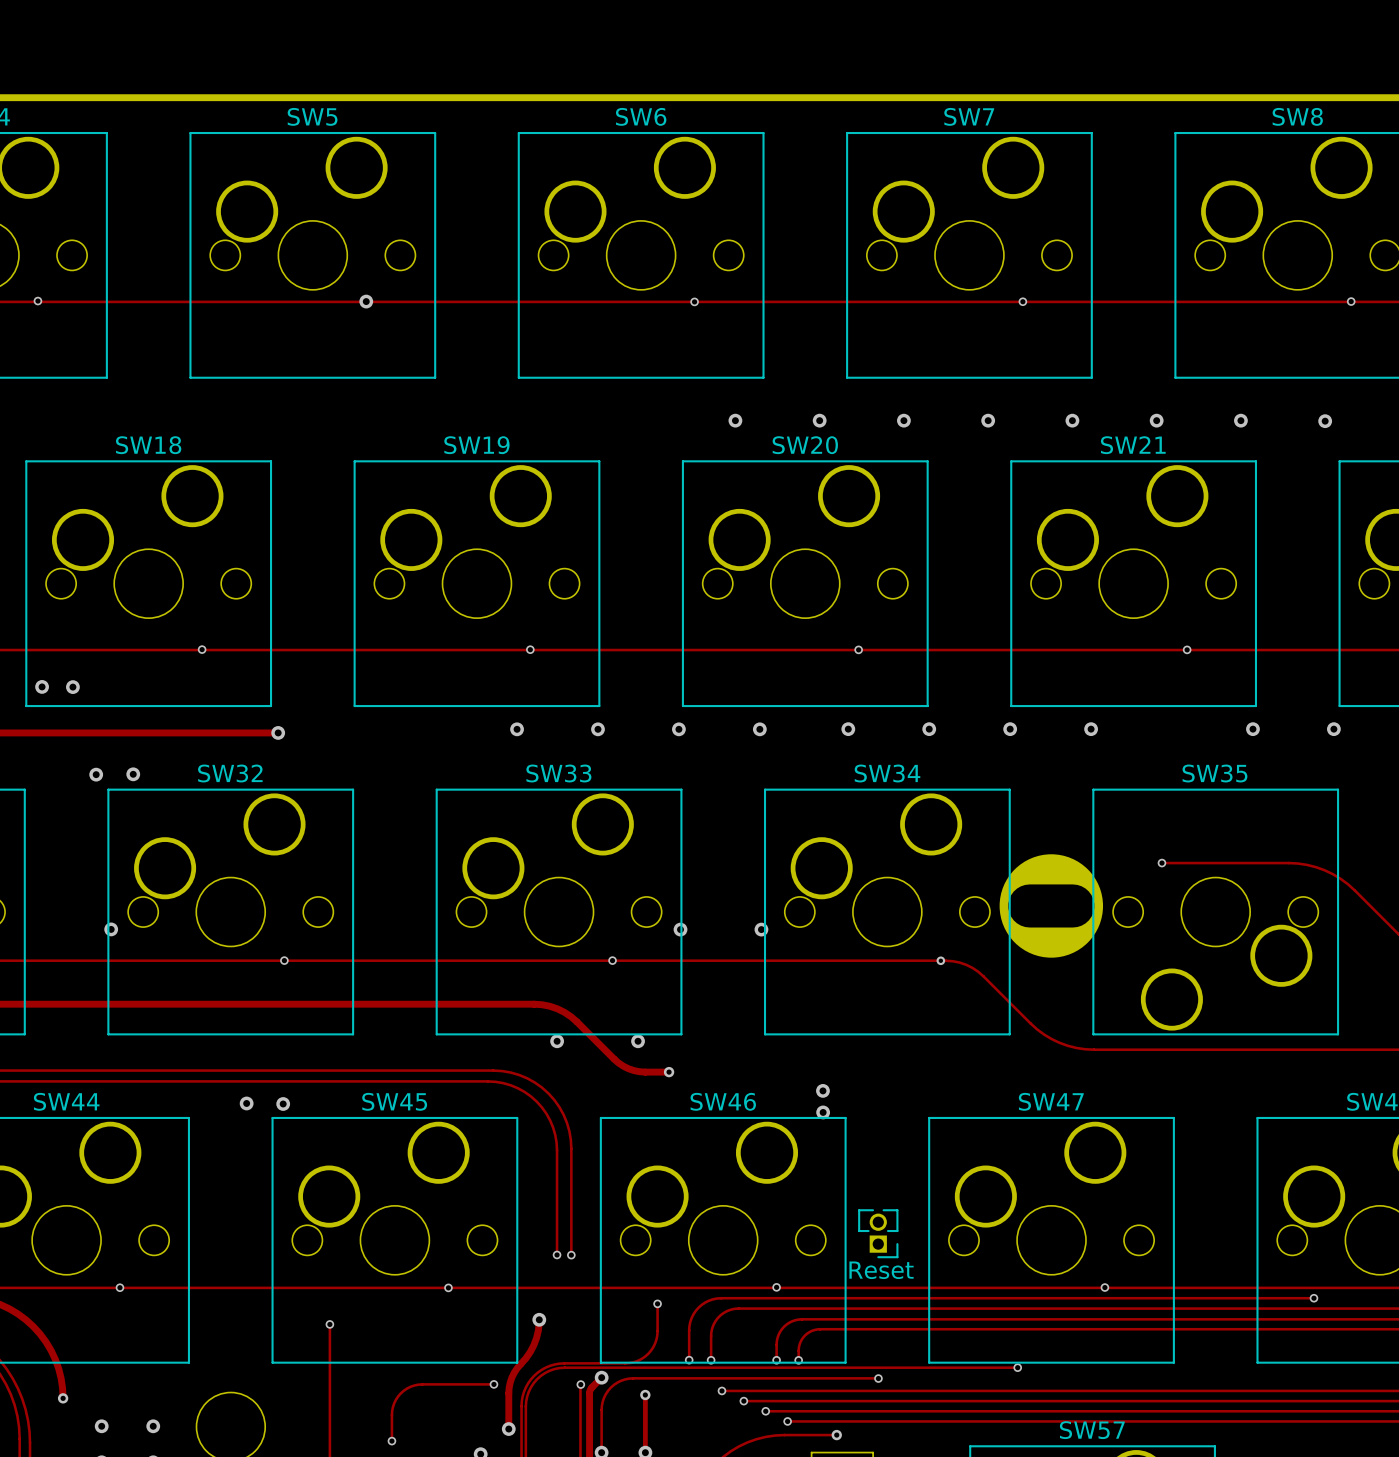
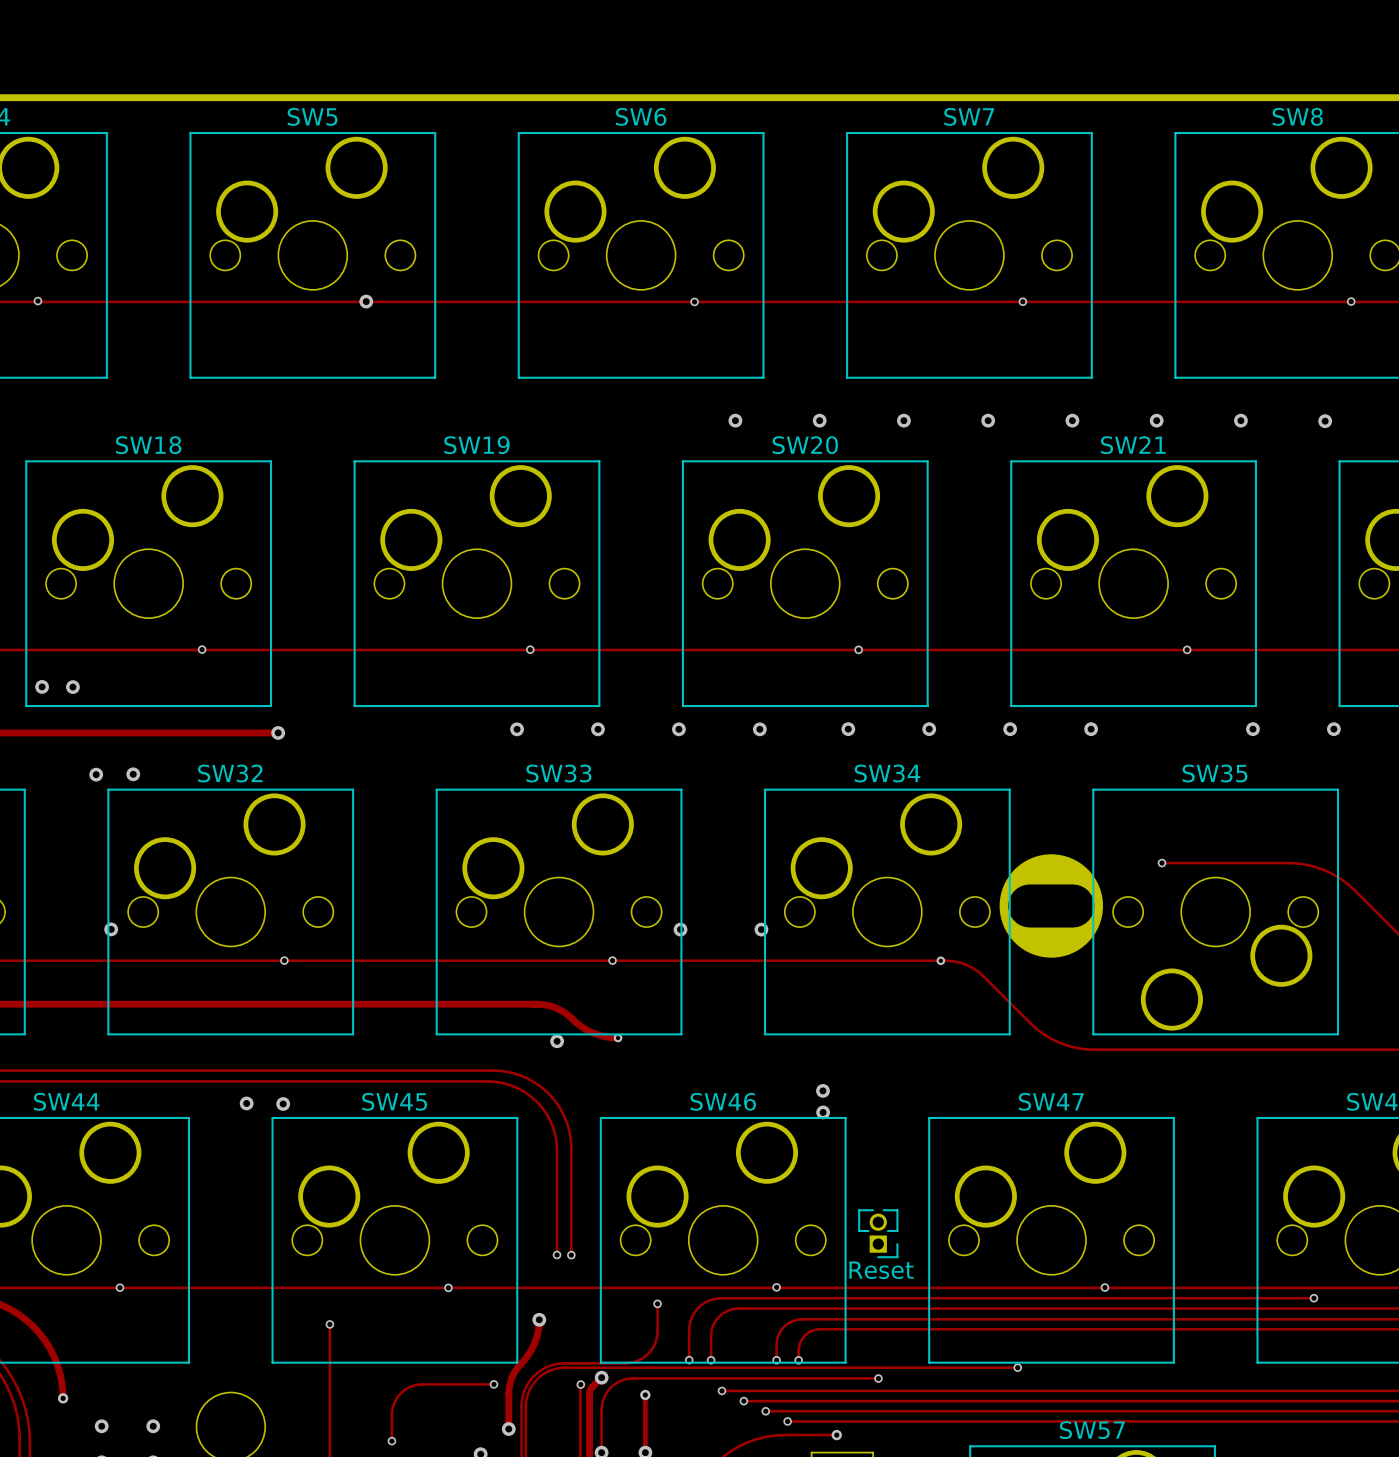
track: (534, 1004) (557, 1008) (571, 1016) (623, 1066) (639, 1071) (669, 1072) -> (534, 1004) (555, 1007) (587, 1030) (599, 1035) (617, 1037)
via: none -> (618, 1037)
via: (638, 1041) -> none
via: (669, 1072) -> none

